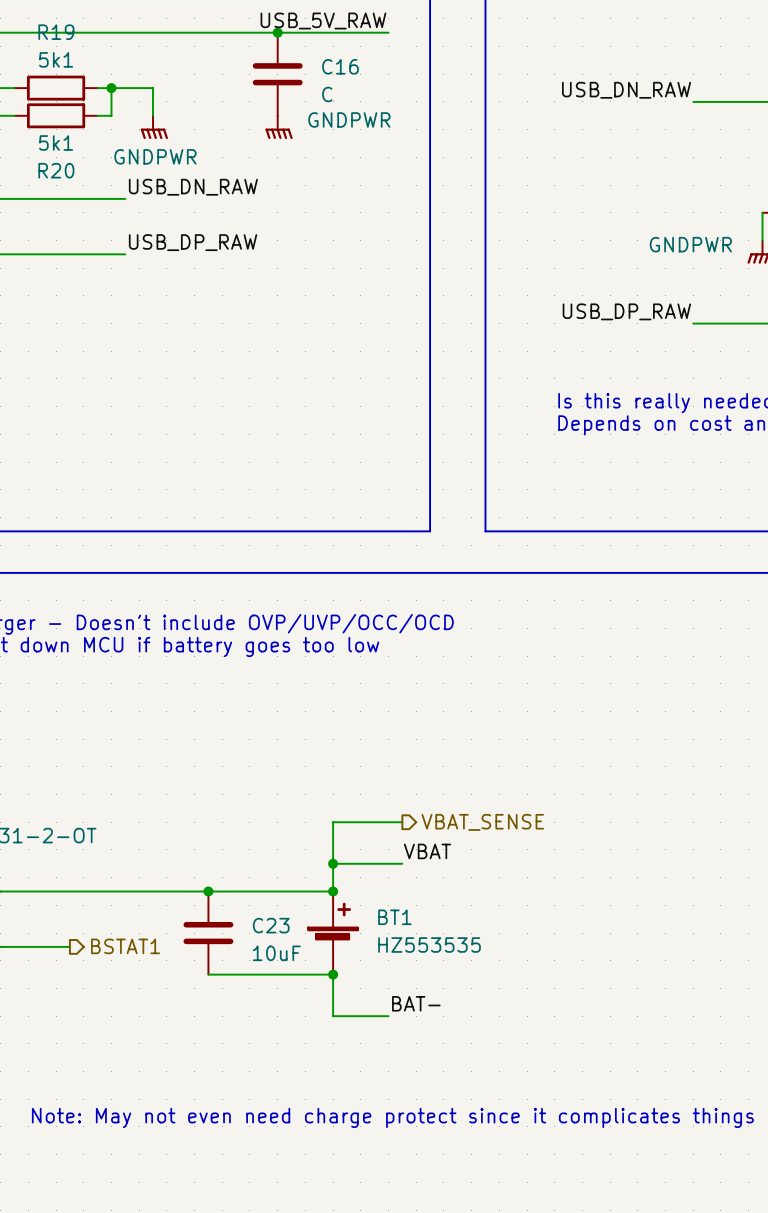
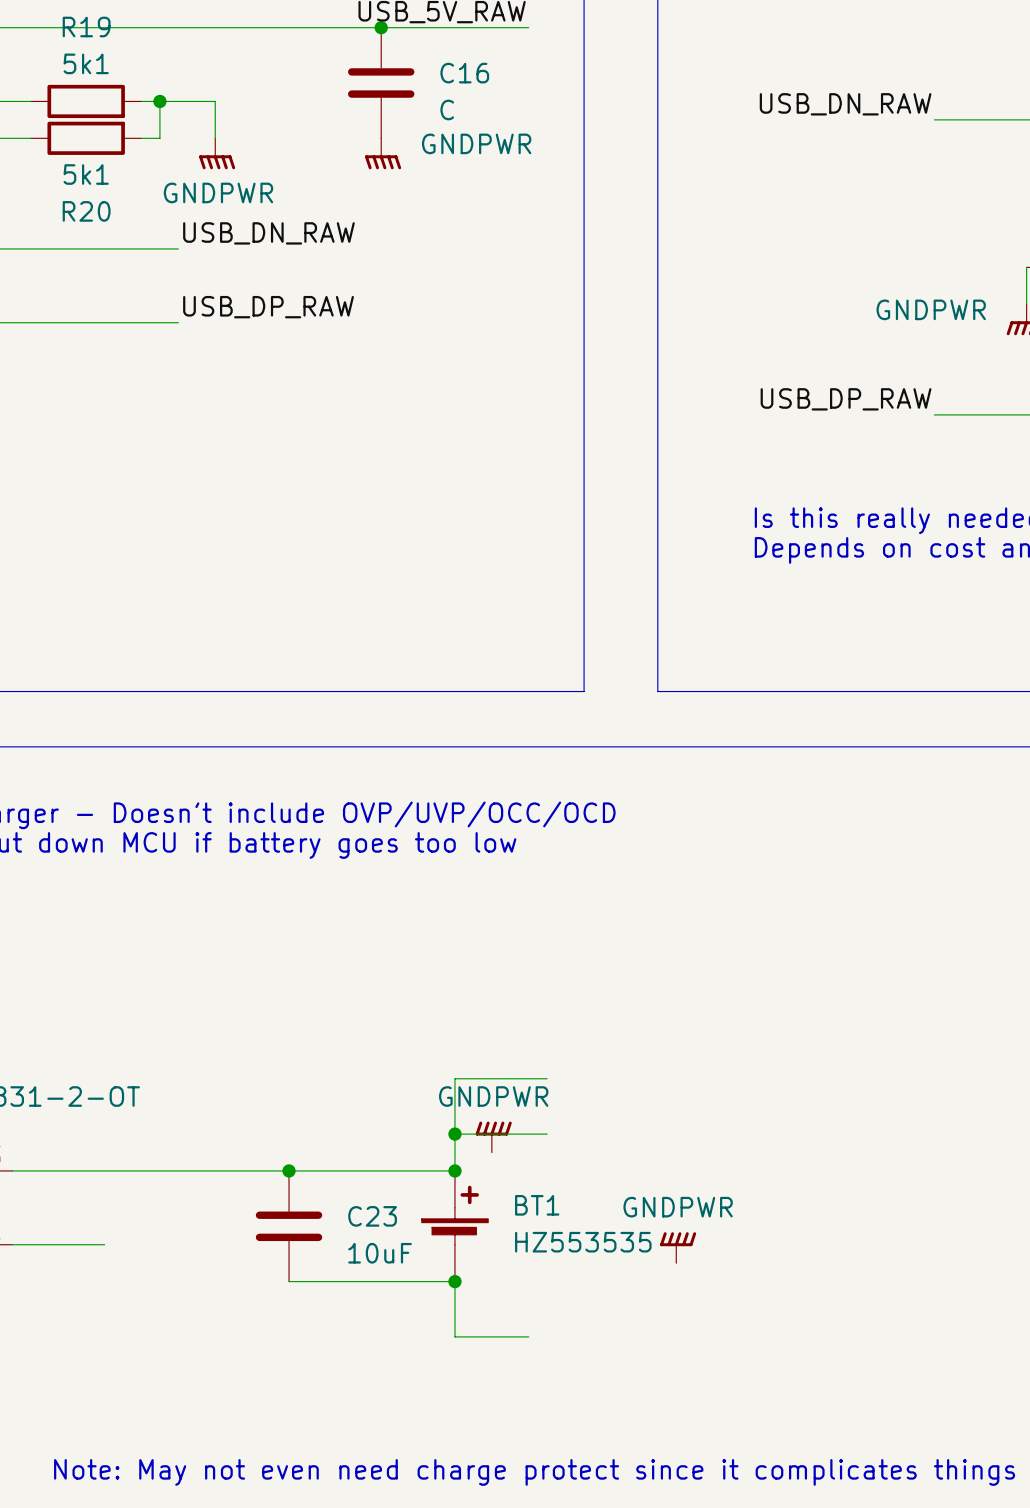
hierarchical label: VBAT_SENSE (482, 822) -> none
label: VBAT (427, 851) -> none
power symbol: none -> GNDPWR (493, 1137)
hierarchical label: BSTAT1 (125, 946) -> none
power symbol: none -> GNDPWR (678, 1247)
label: BAT- (416, 1003) -> none

